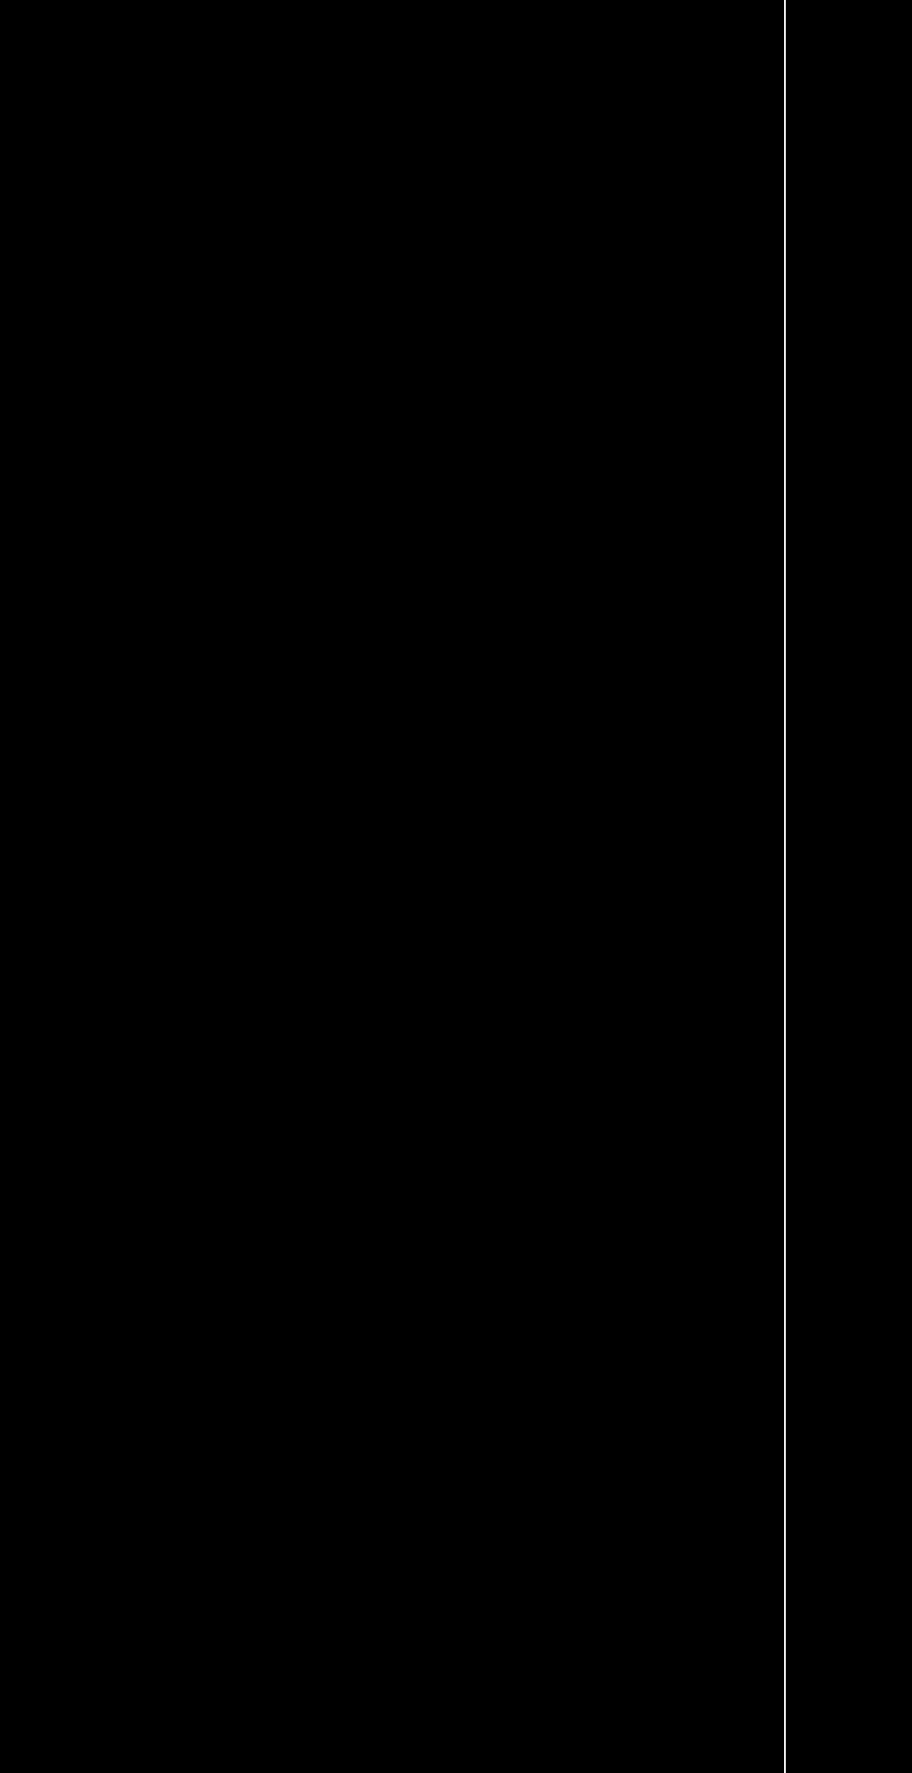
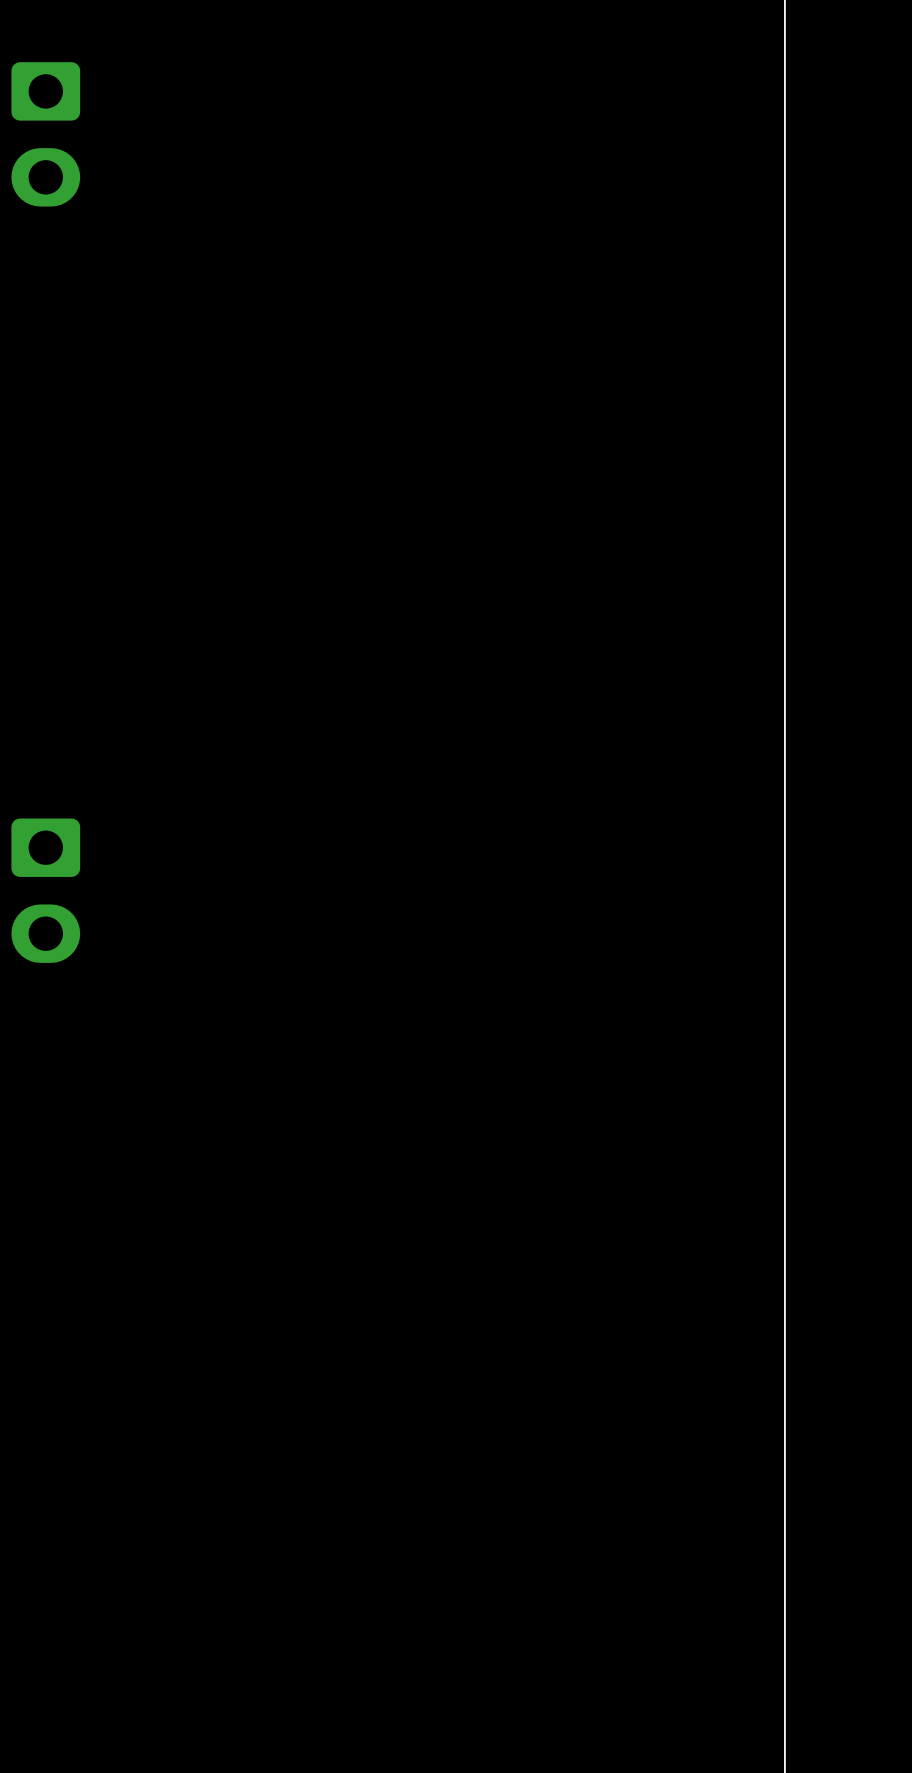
part: none -> (45, 134)
part: none -> (45, 890)

